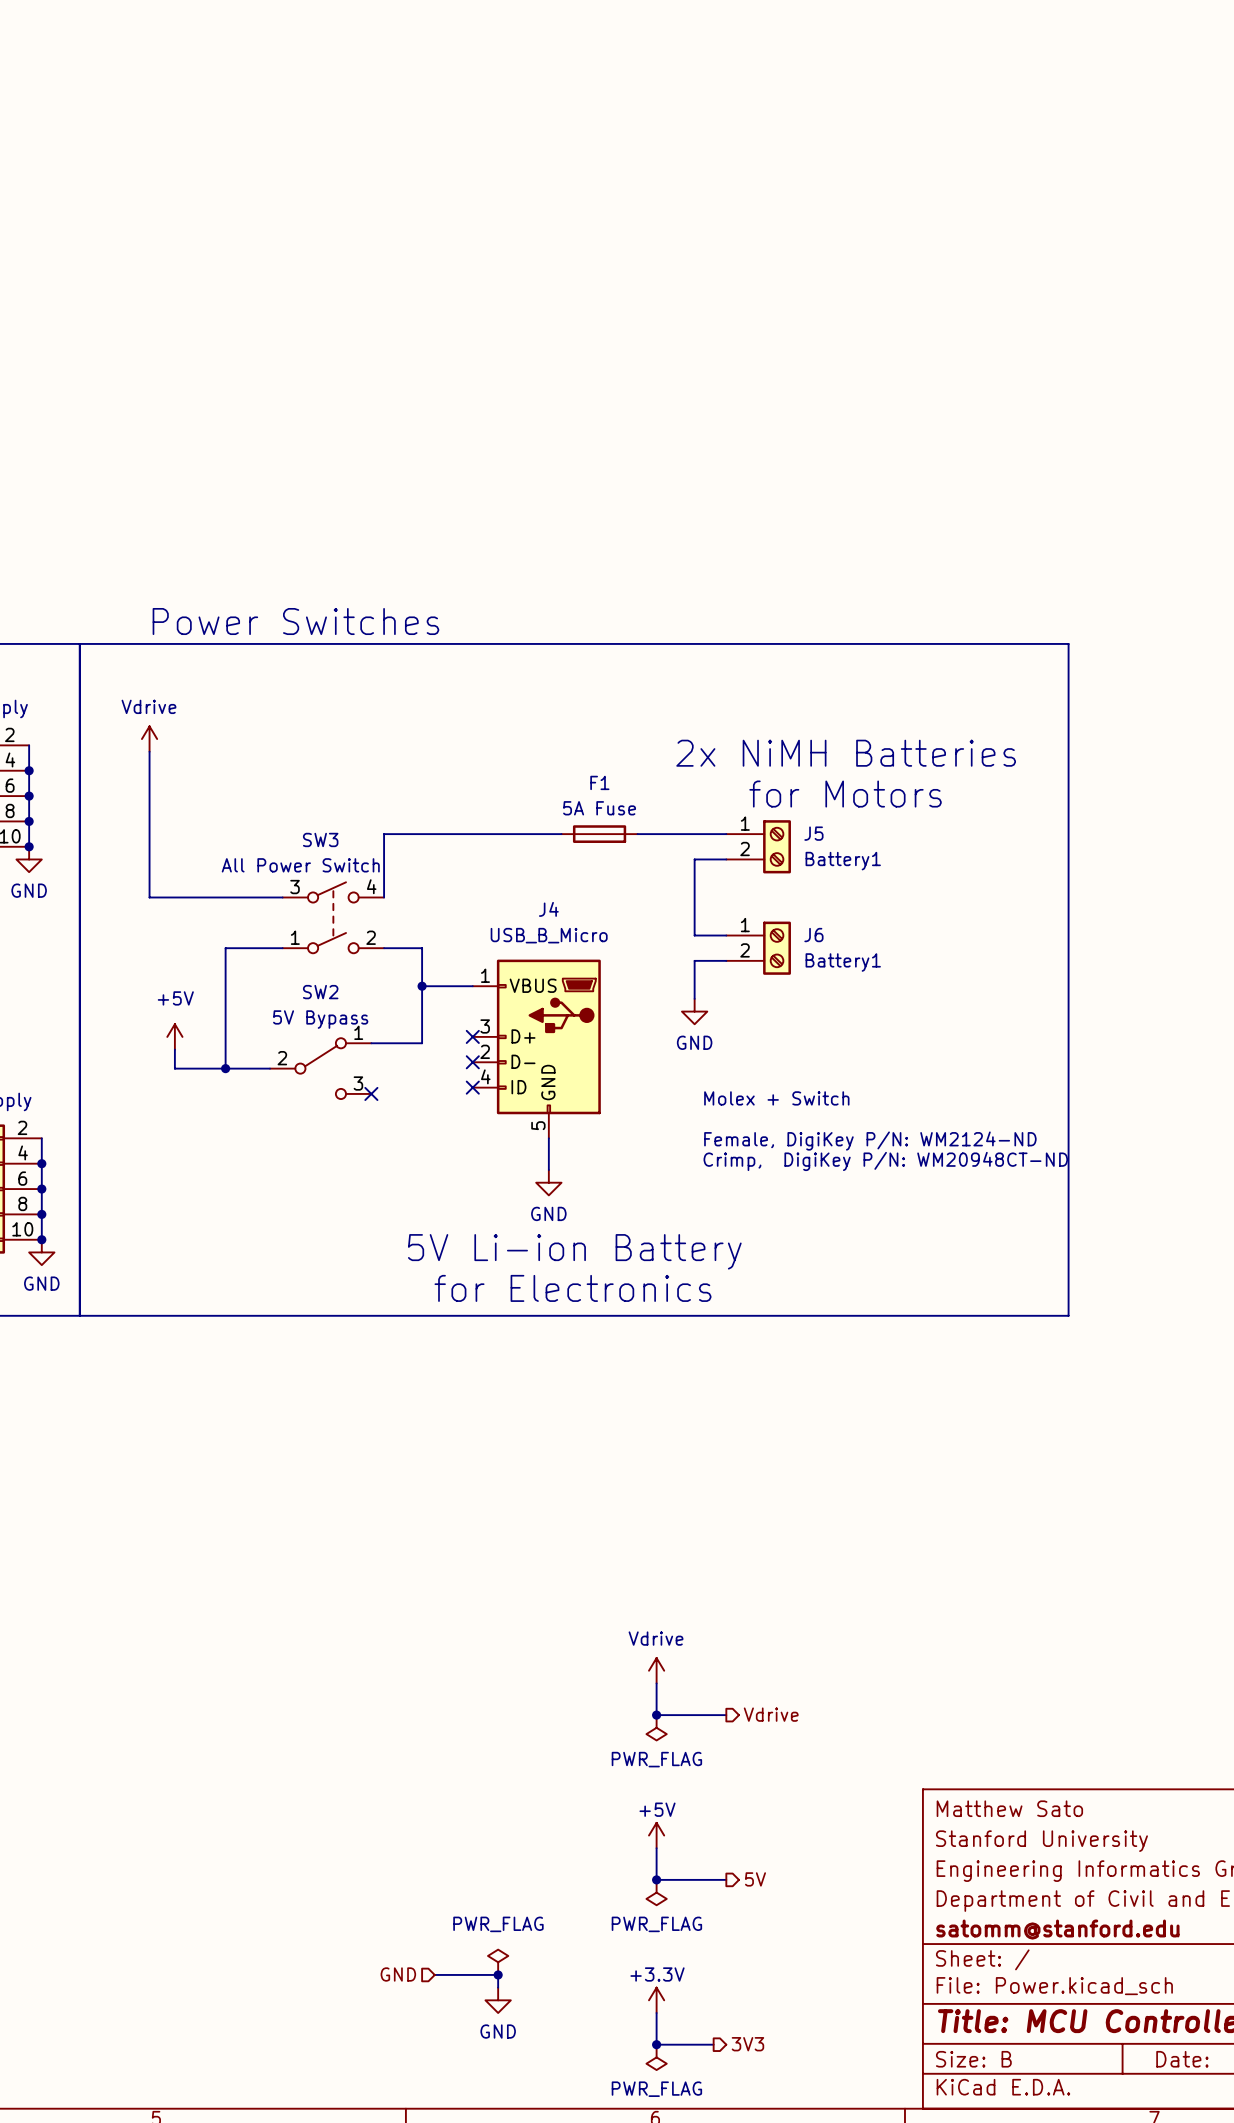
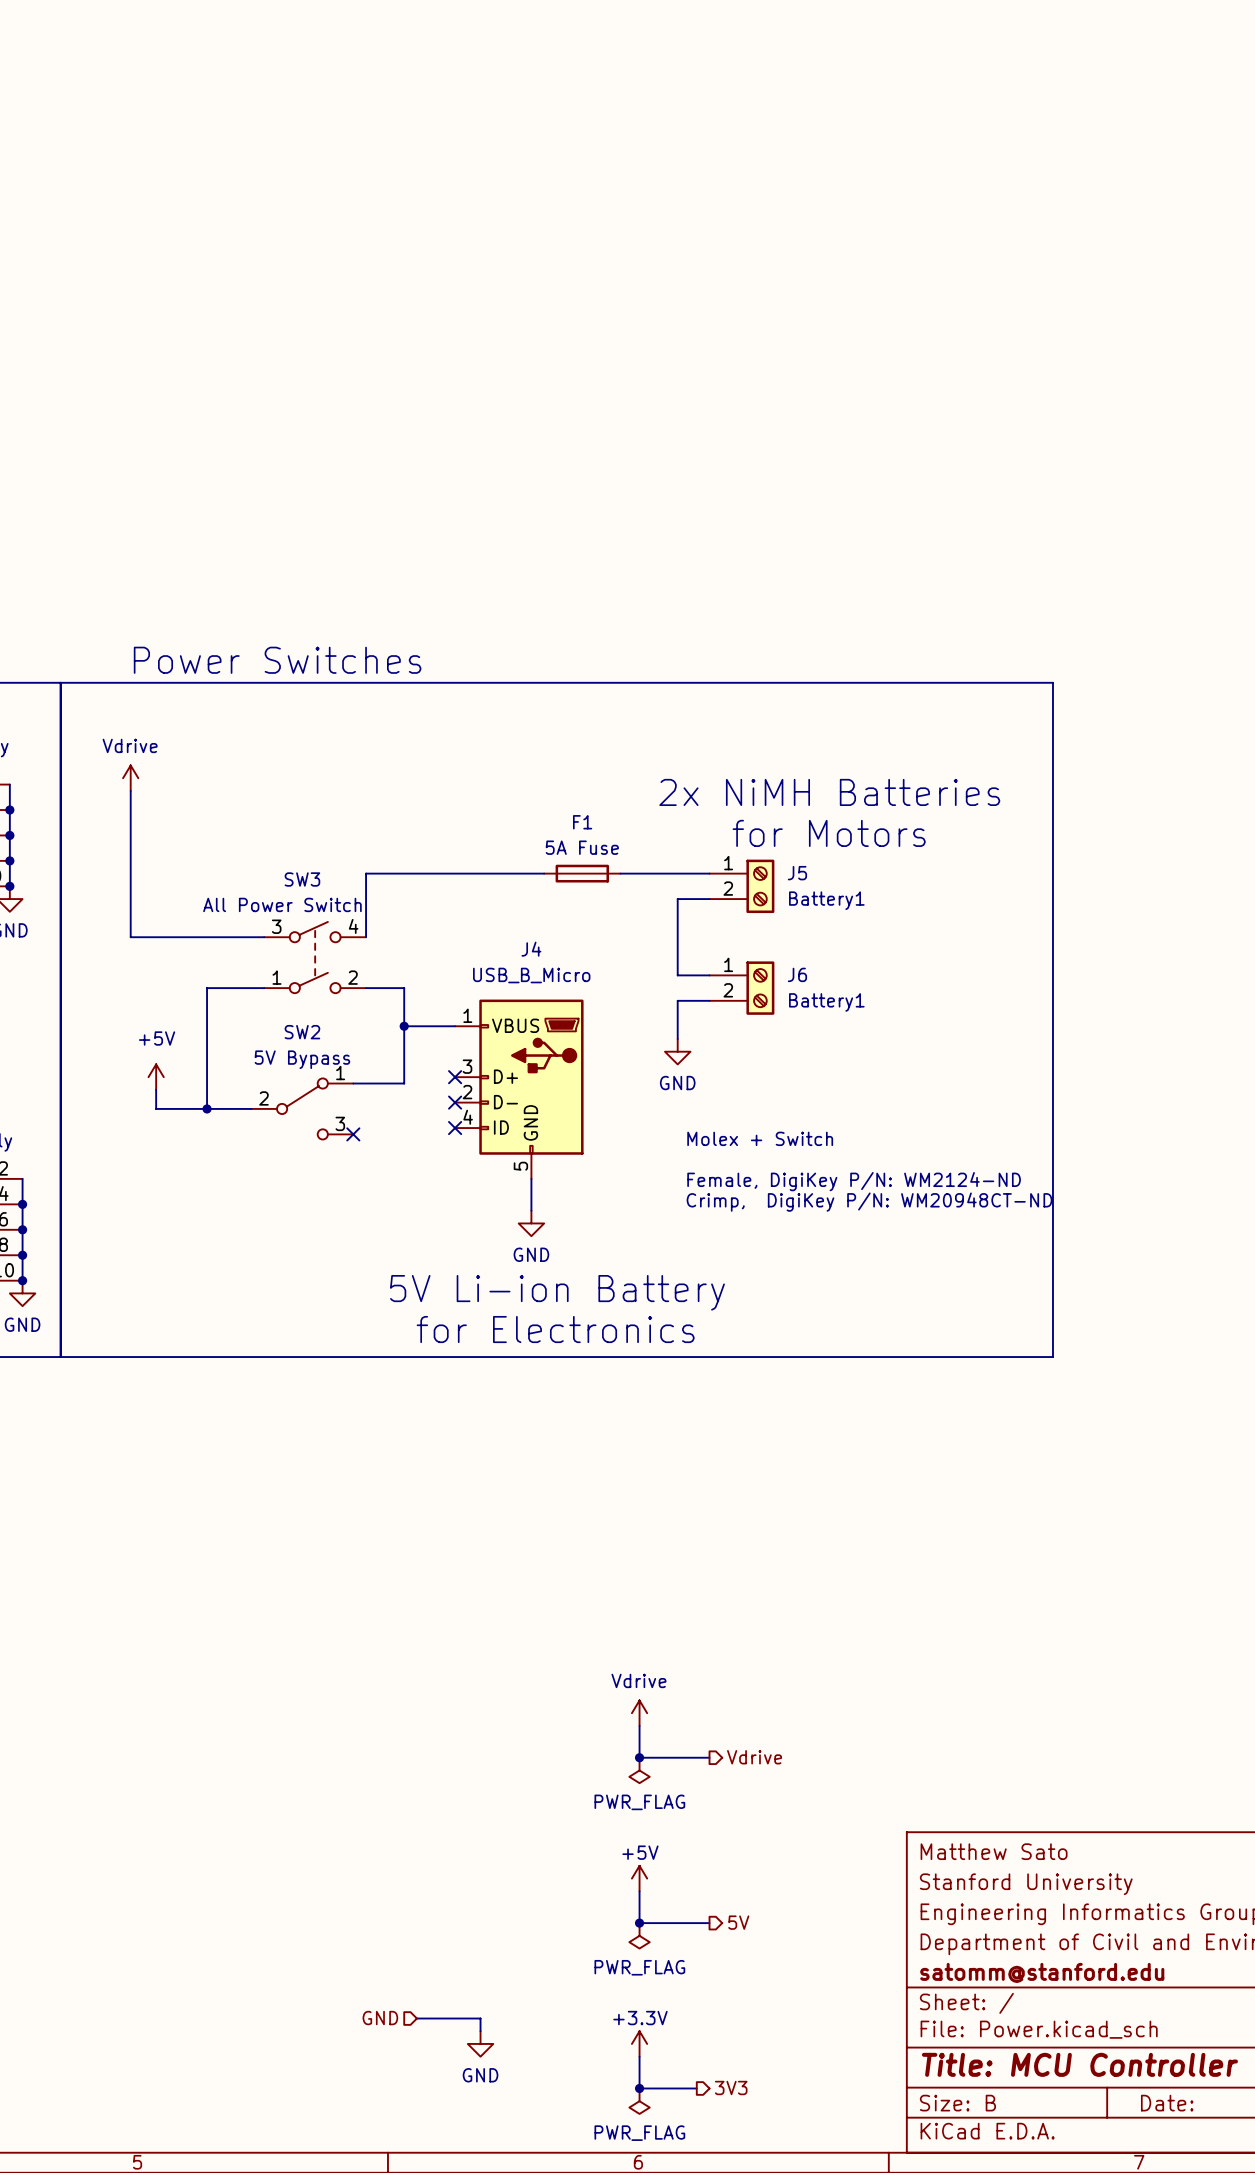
power symbol: PWR_FLAG (498, 1962) -> none
junction: (498, 1974) -> none

